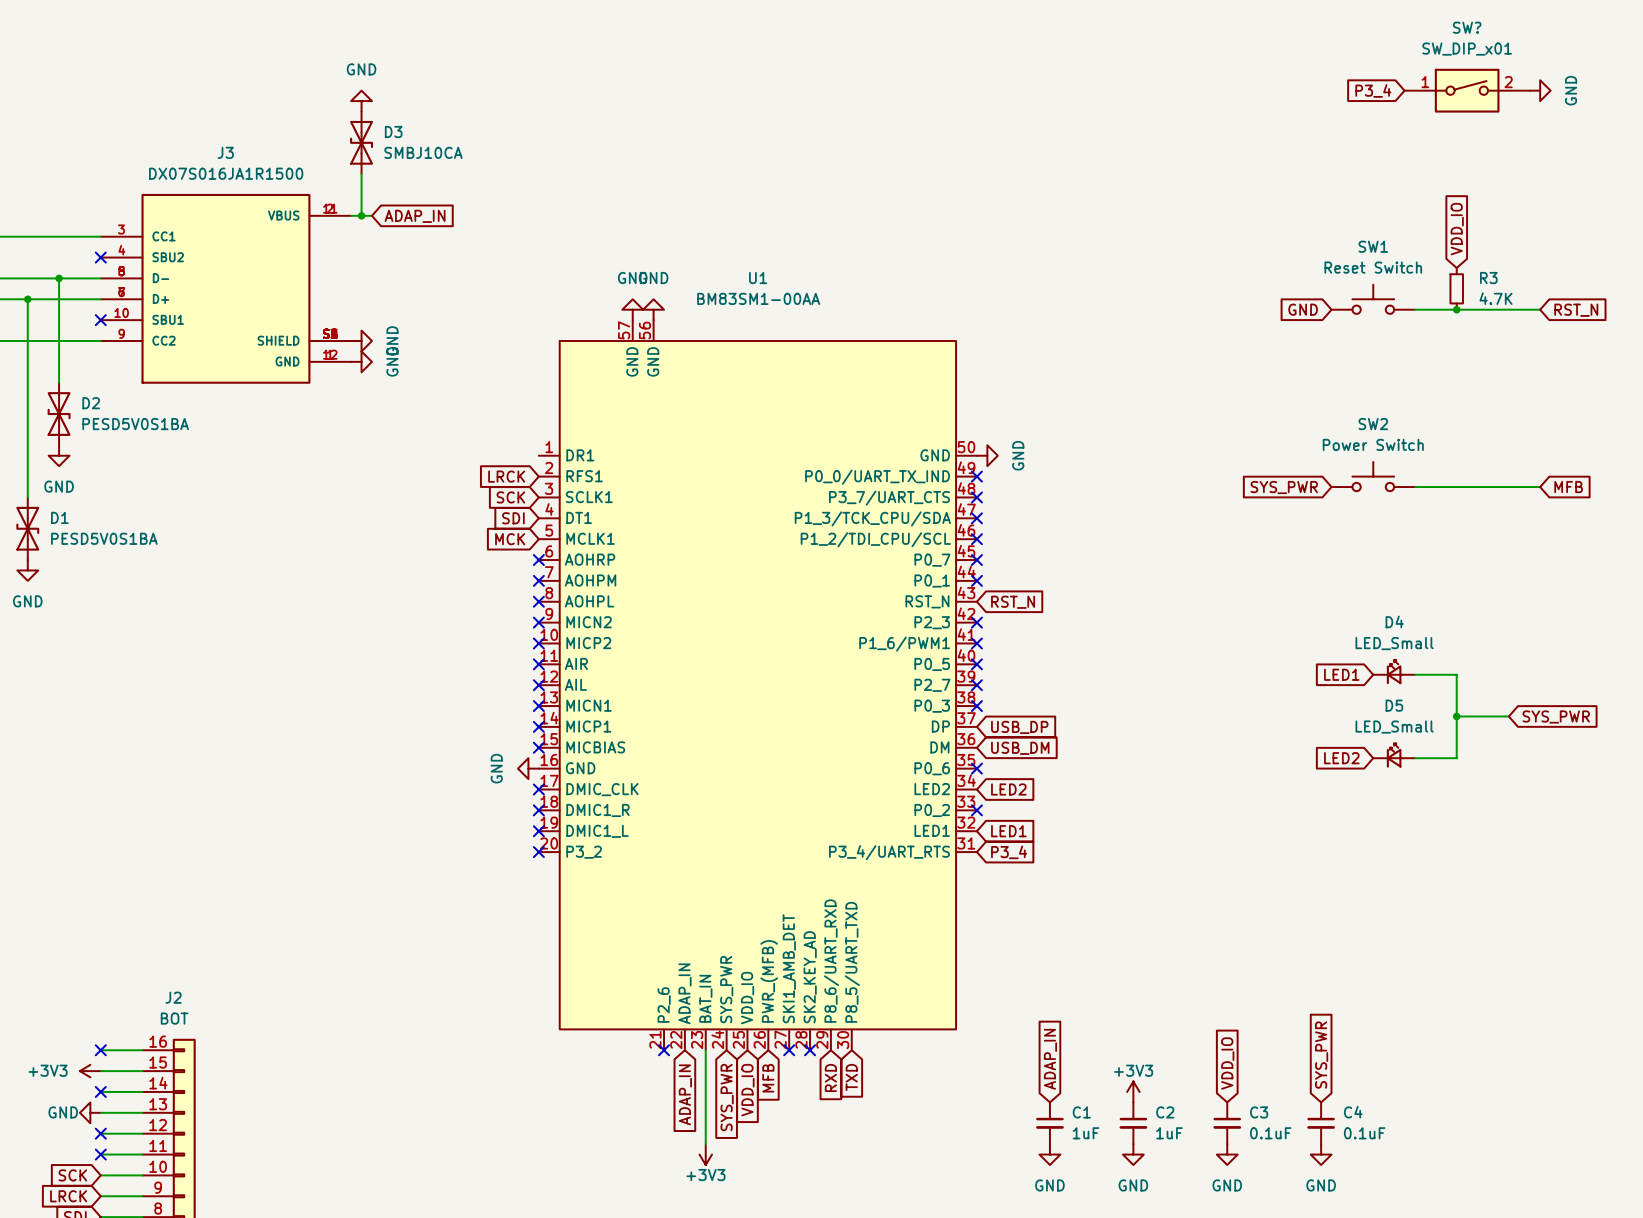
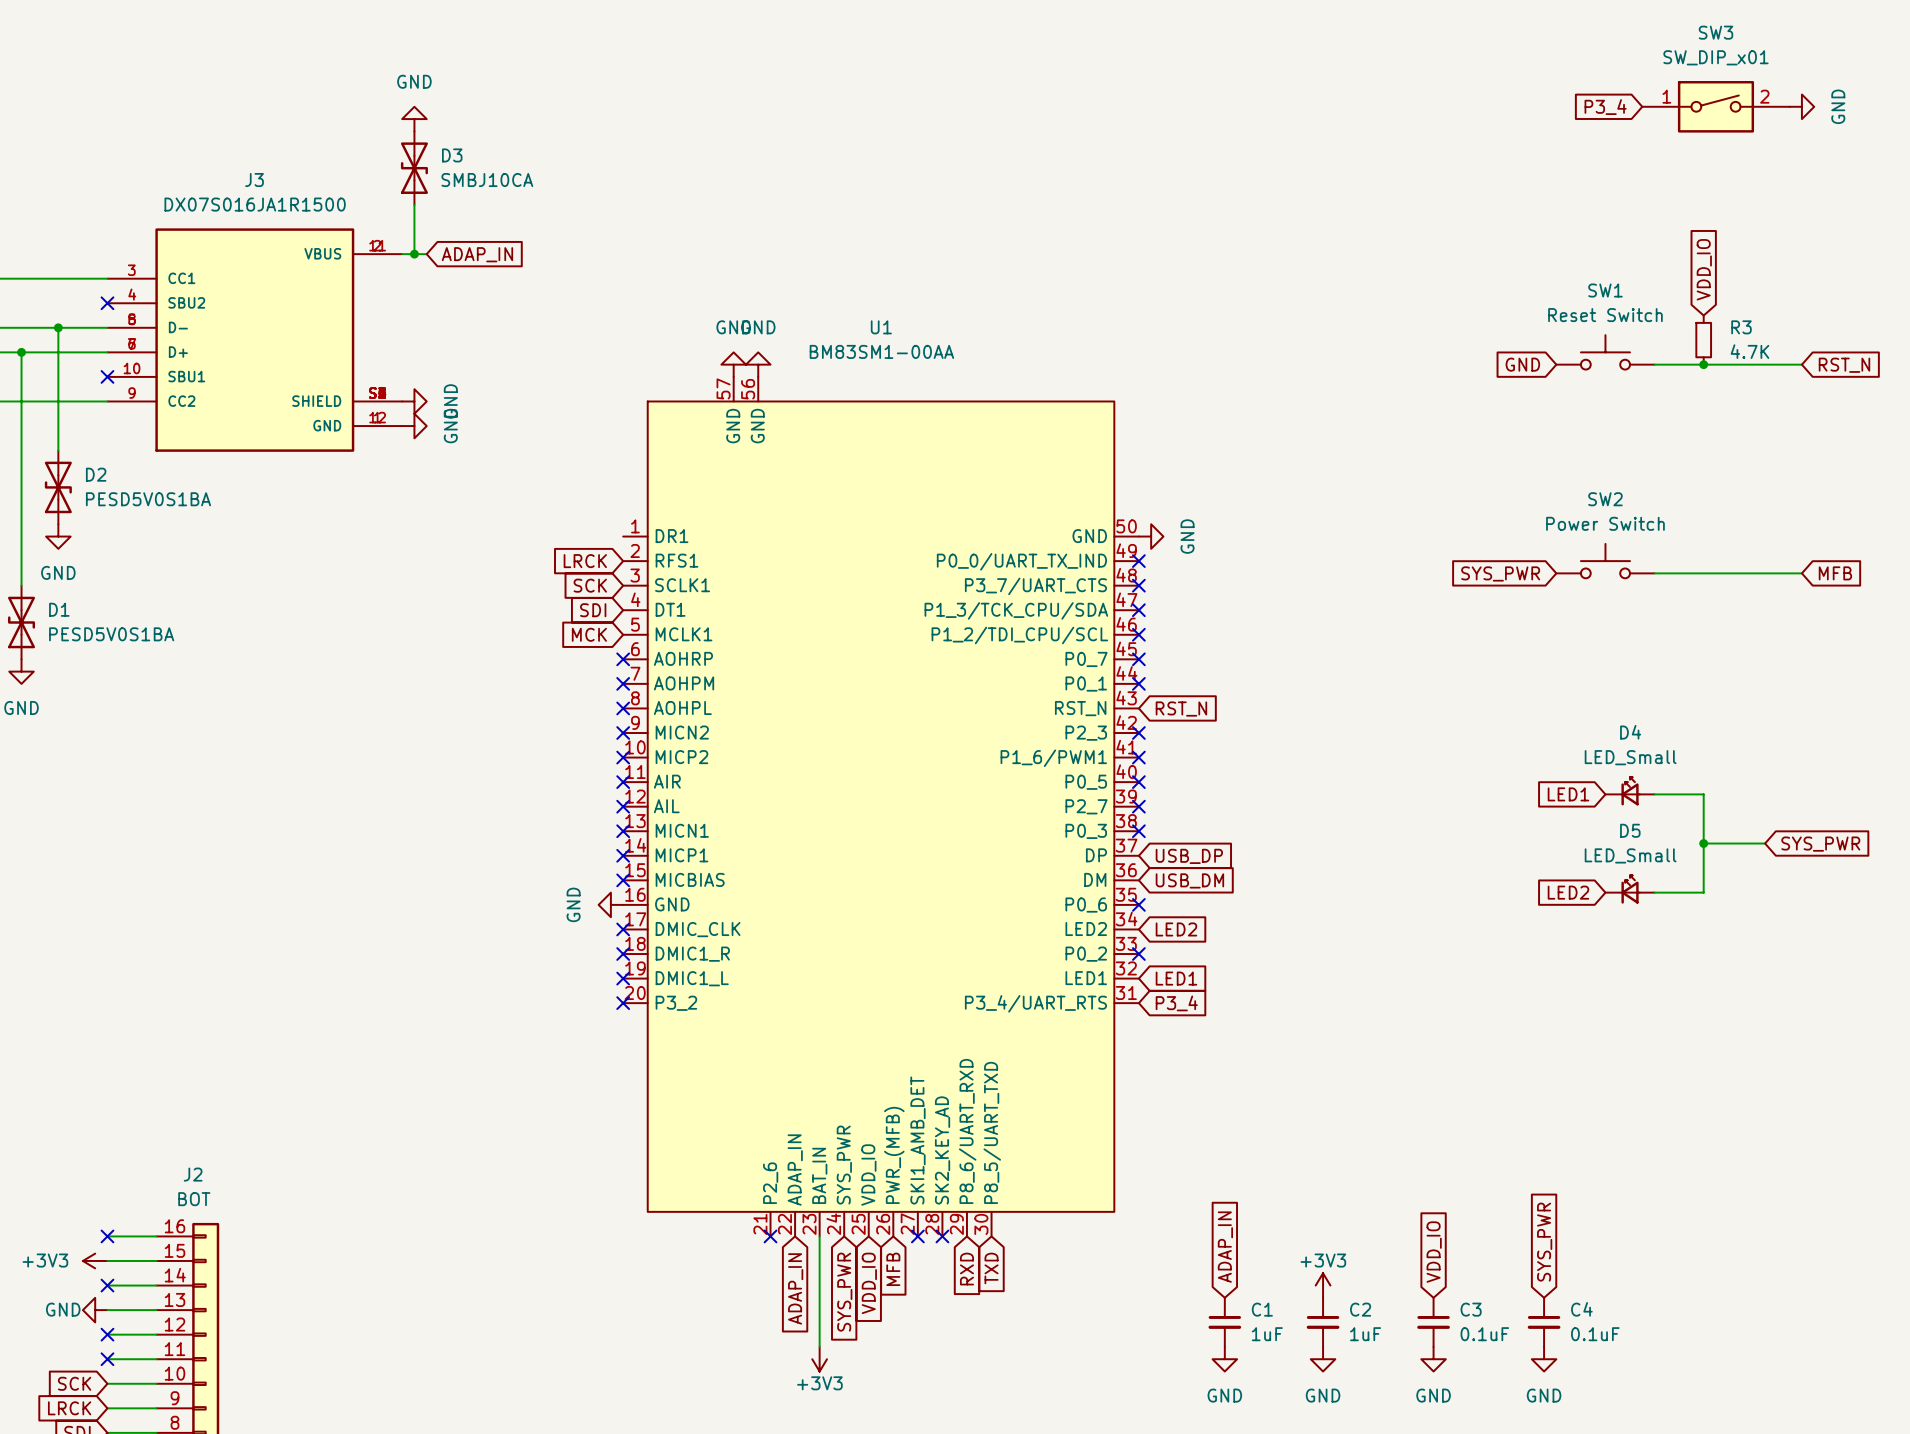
SW? name: SW? (1467, 27) -> SW3 (1715, 32)

